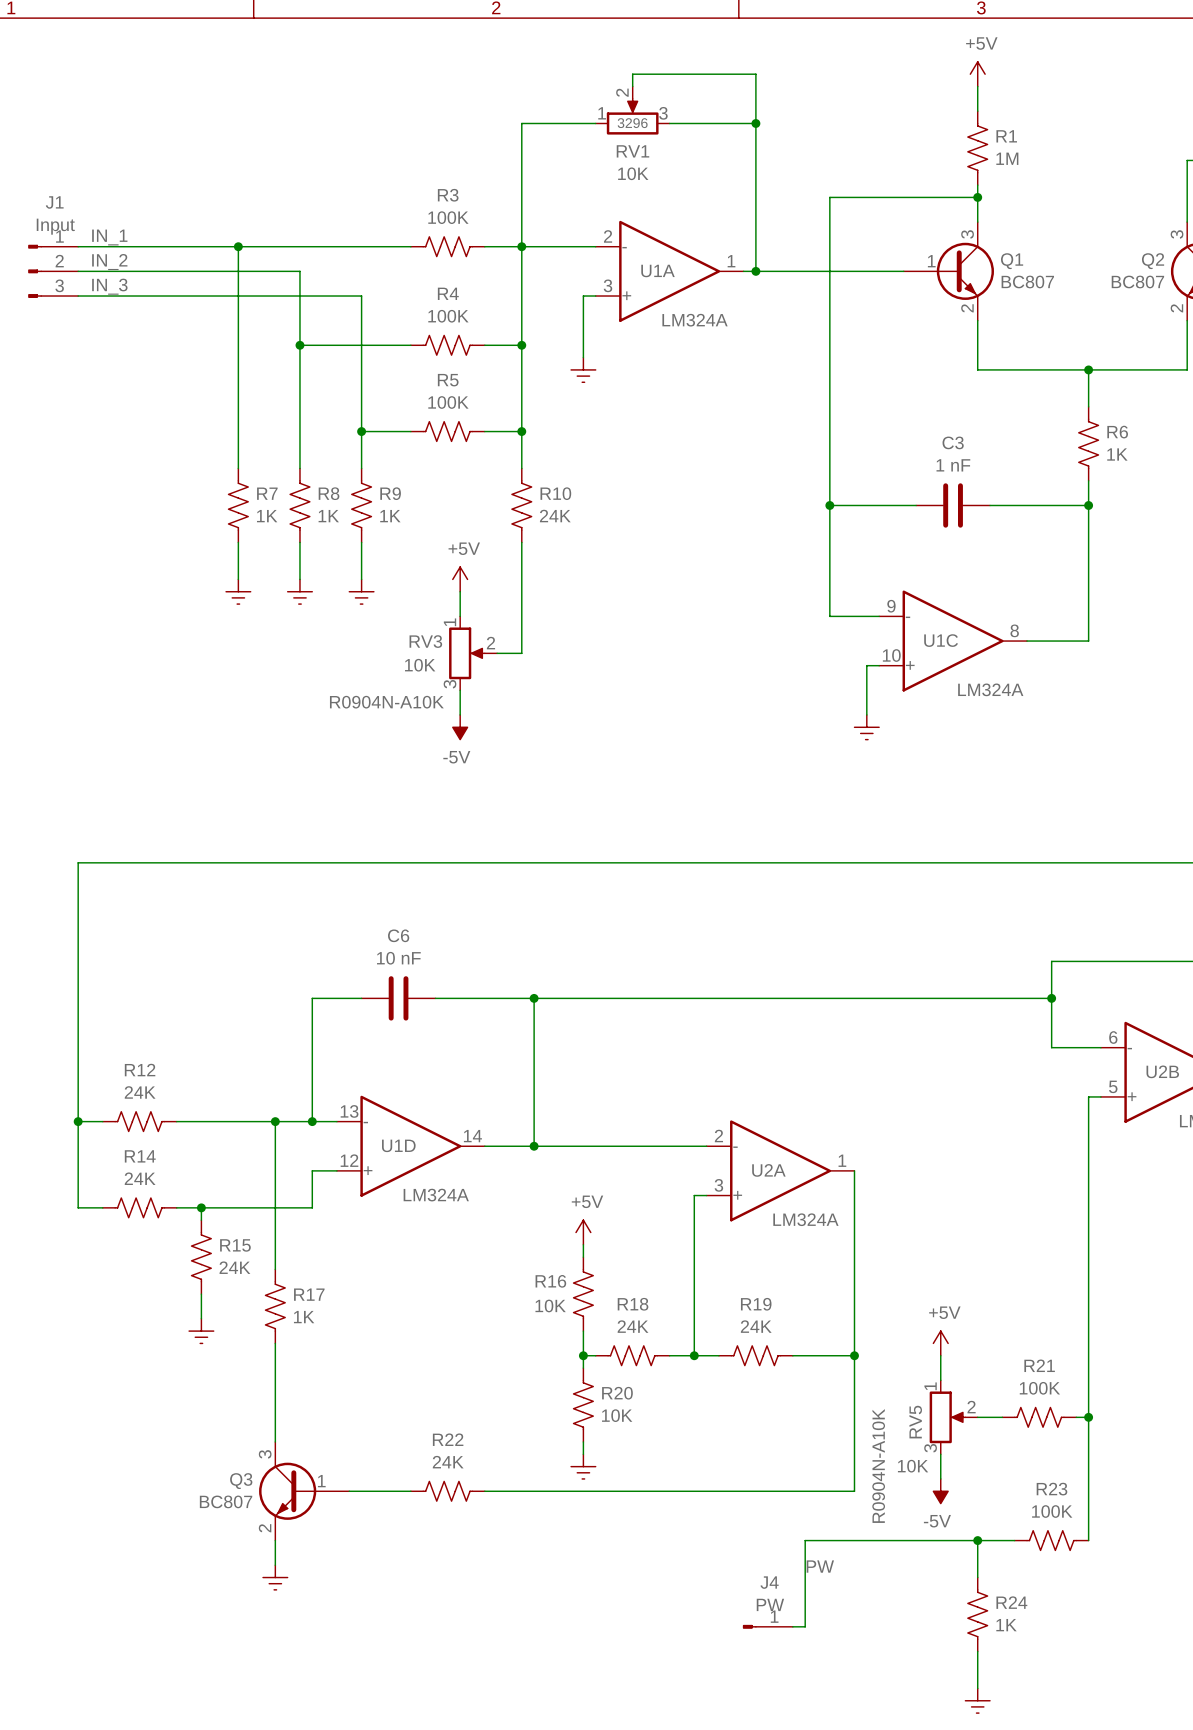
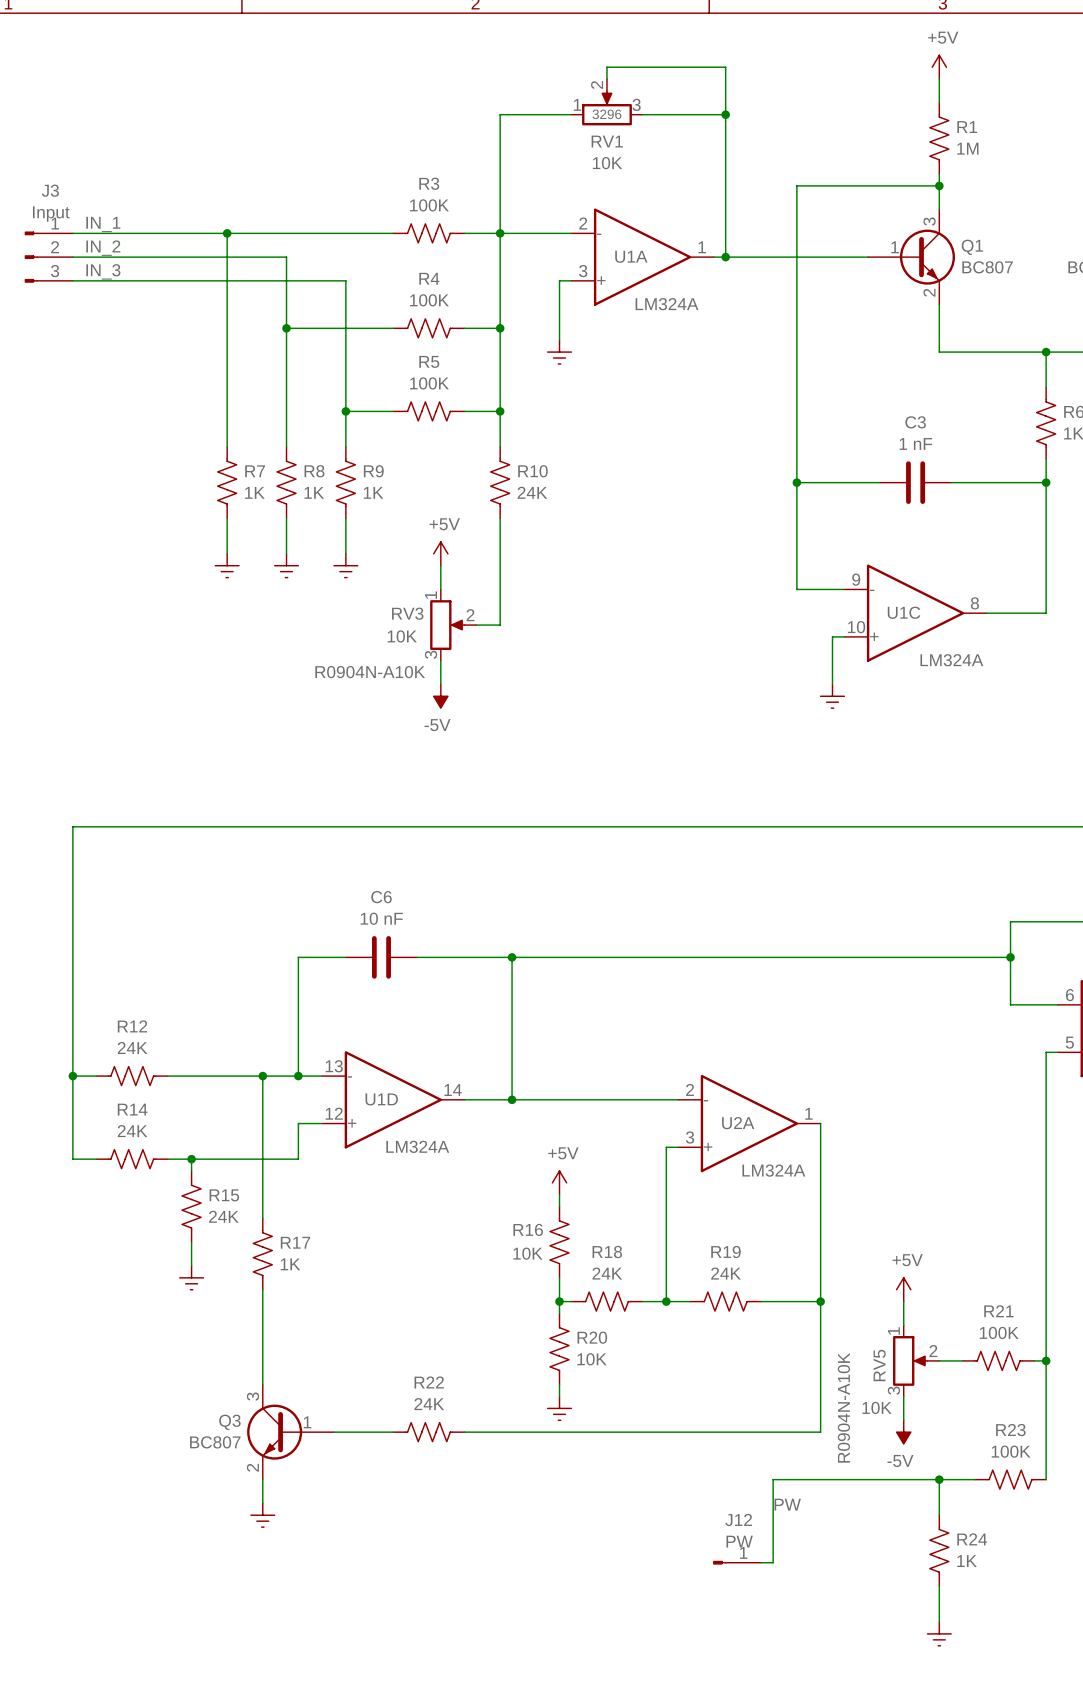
J1 name: J1 (54, 202) -> J3 (50, 190)
J4 name: J4 (769, 1582) -> J12 (738, 1520)

